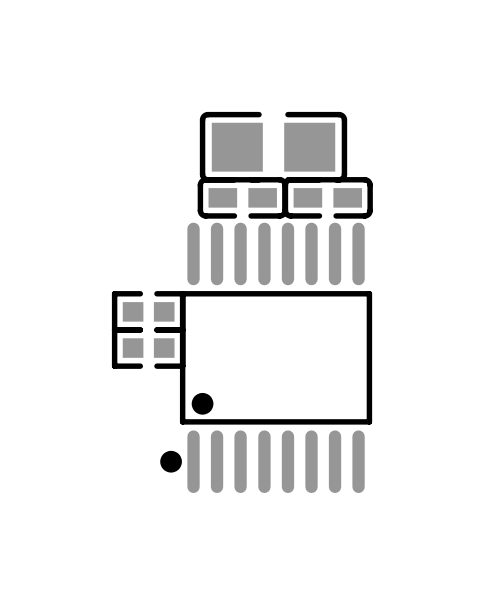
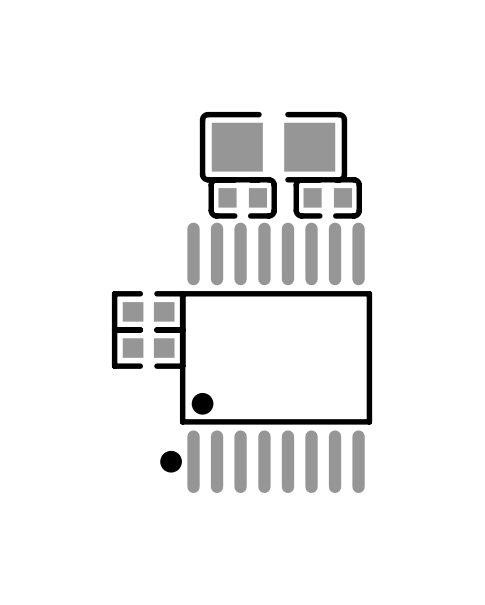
part footprint: [197, 177, 288, 219] -> [208, 177, 277, 219]
part footprint: [282, 177, 373, 219] -> [293, 177, 362, 219]

